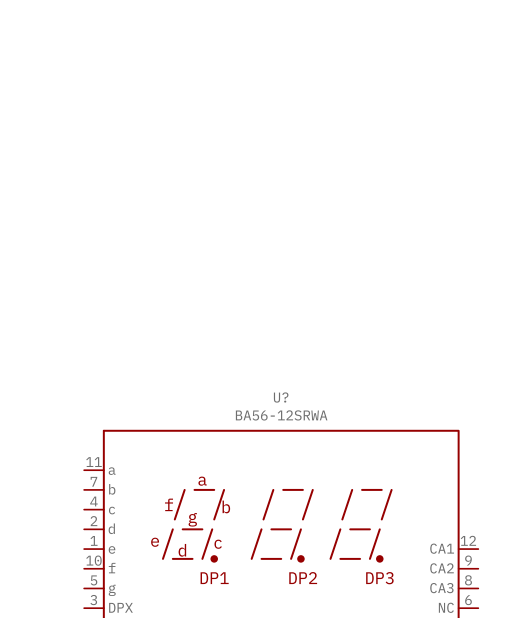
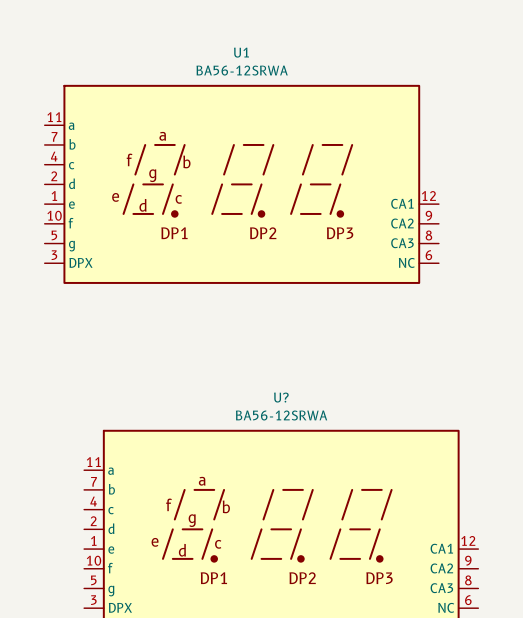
U1: none -> BA56-12SRWA (241, 184)

